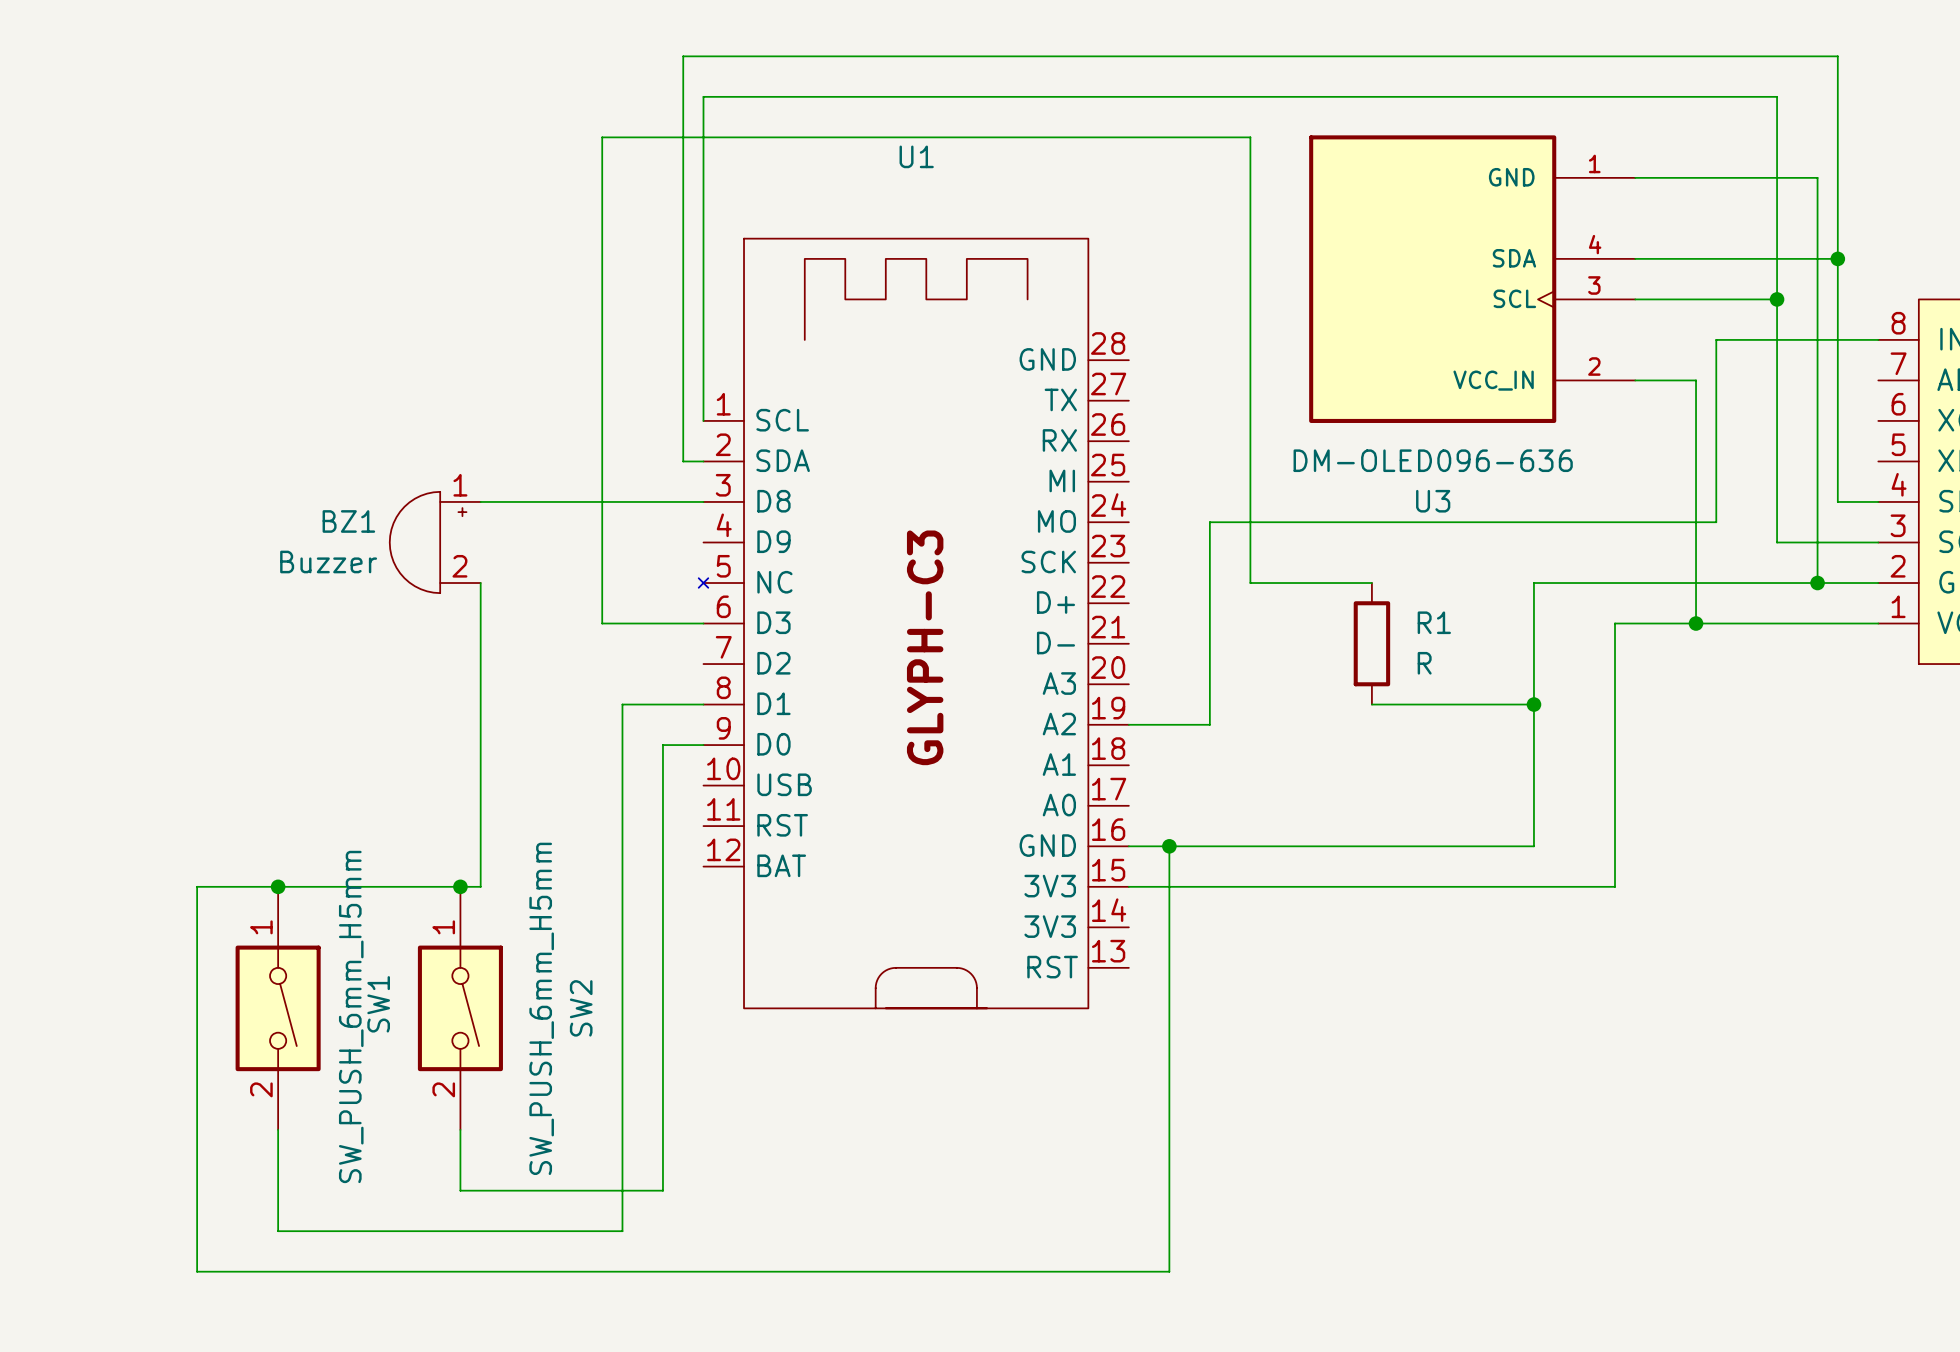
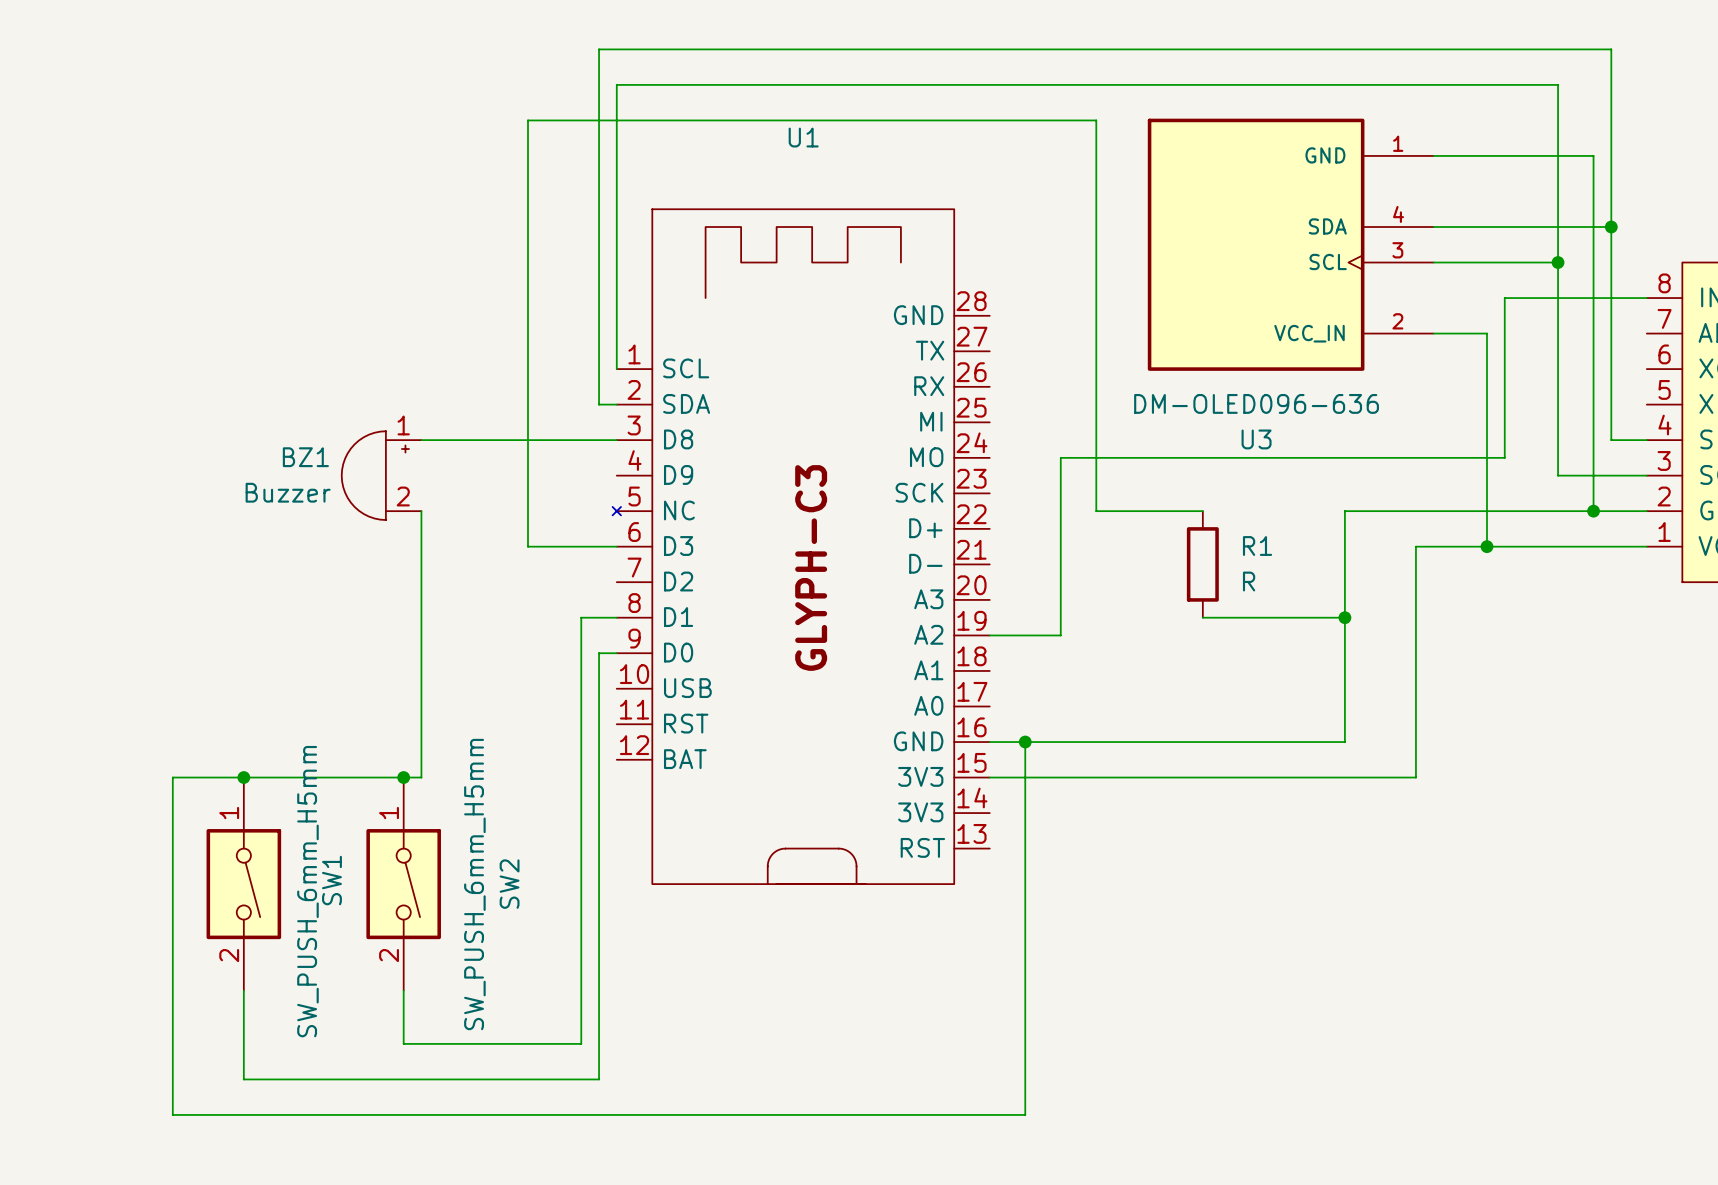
wire: (662, 704) (622, 704) (622, 1231) -> (599, 653) (599, 1079) (545, 1079)
wire: (662, 745) (683, 745) -> (581, 653) (581, 617)

